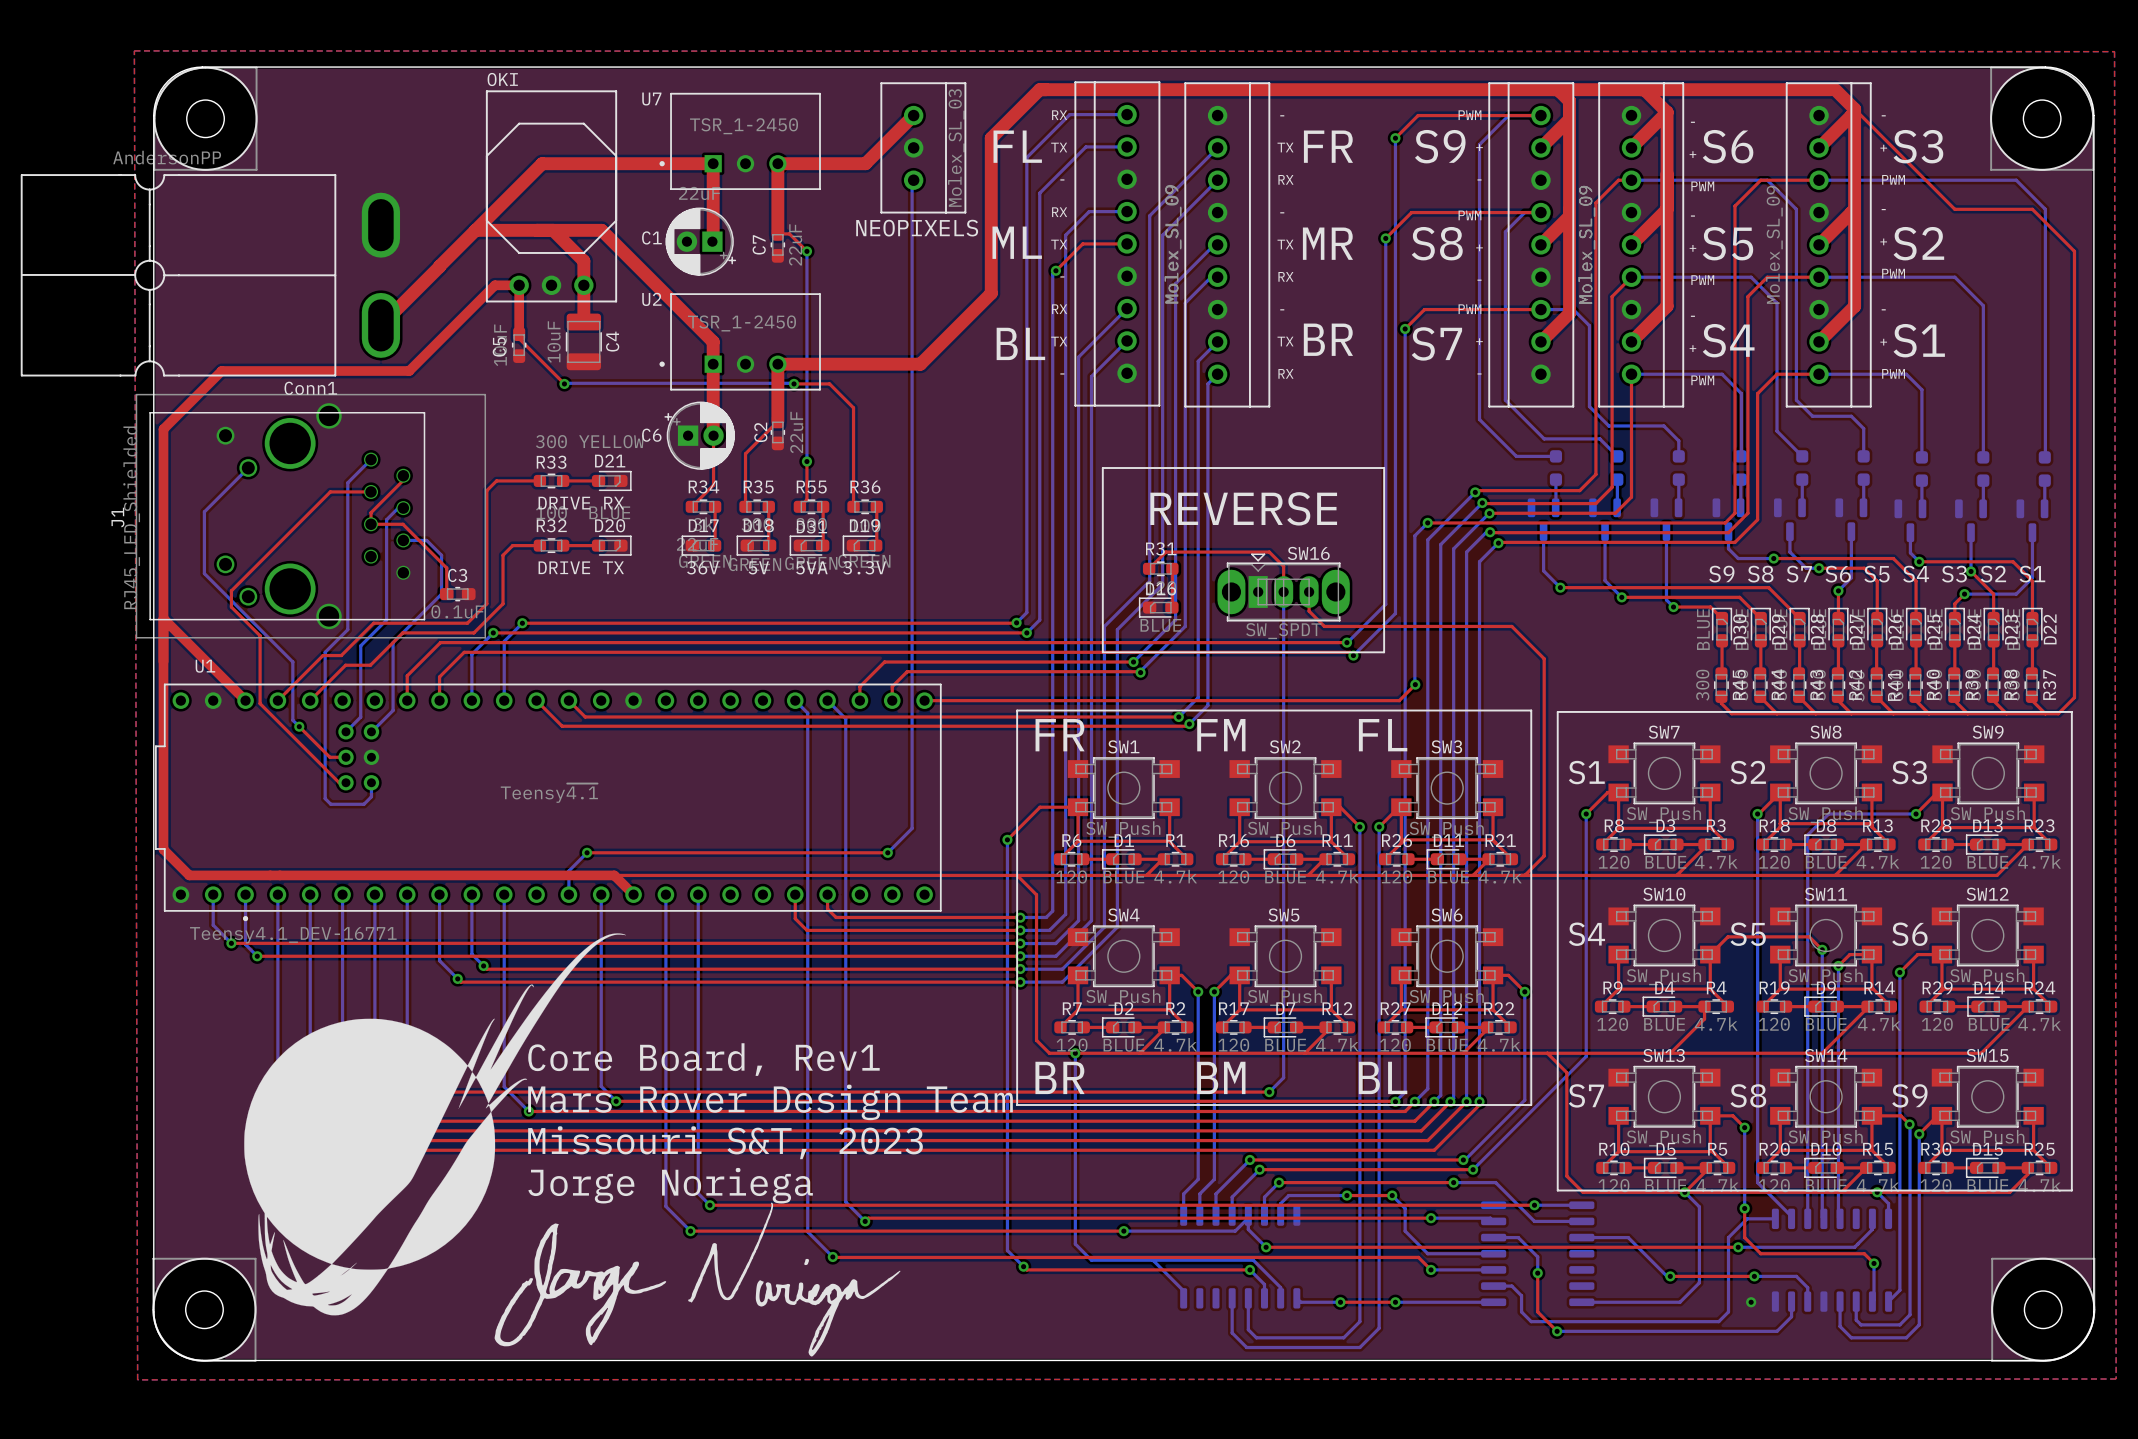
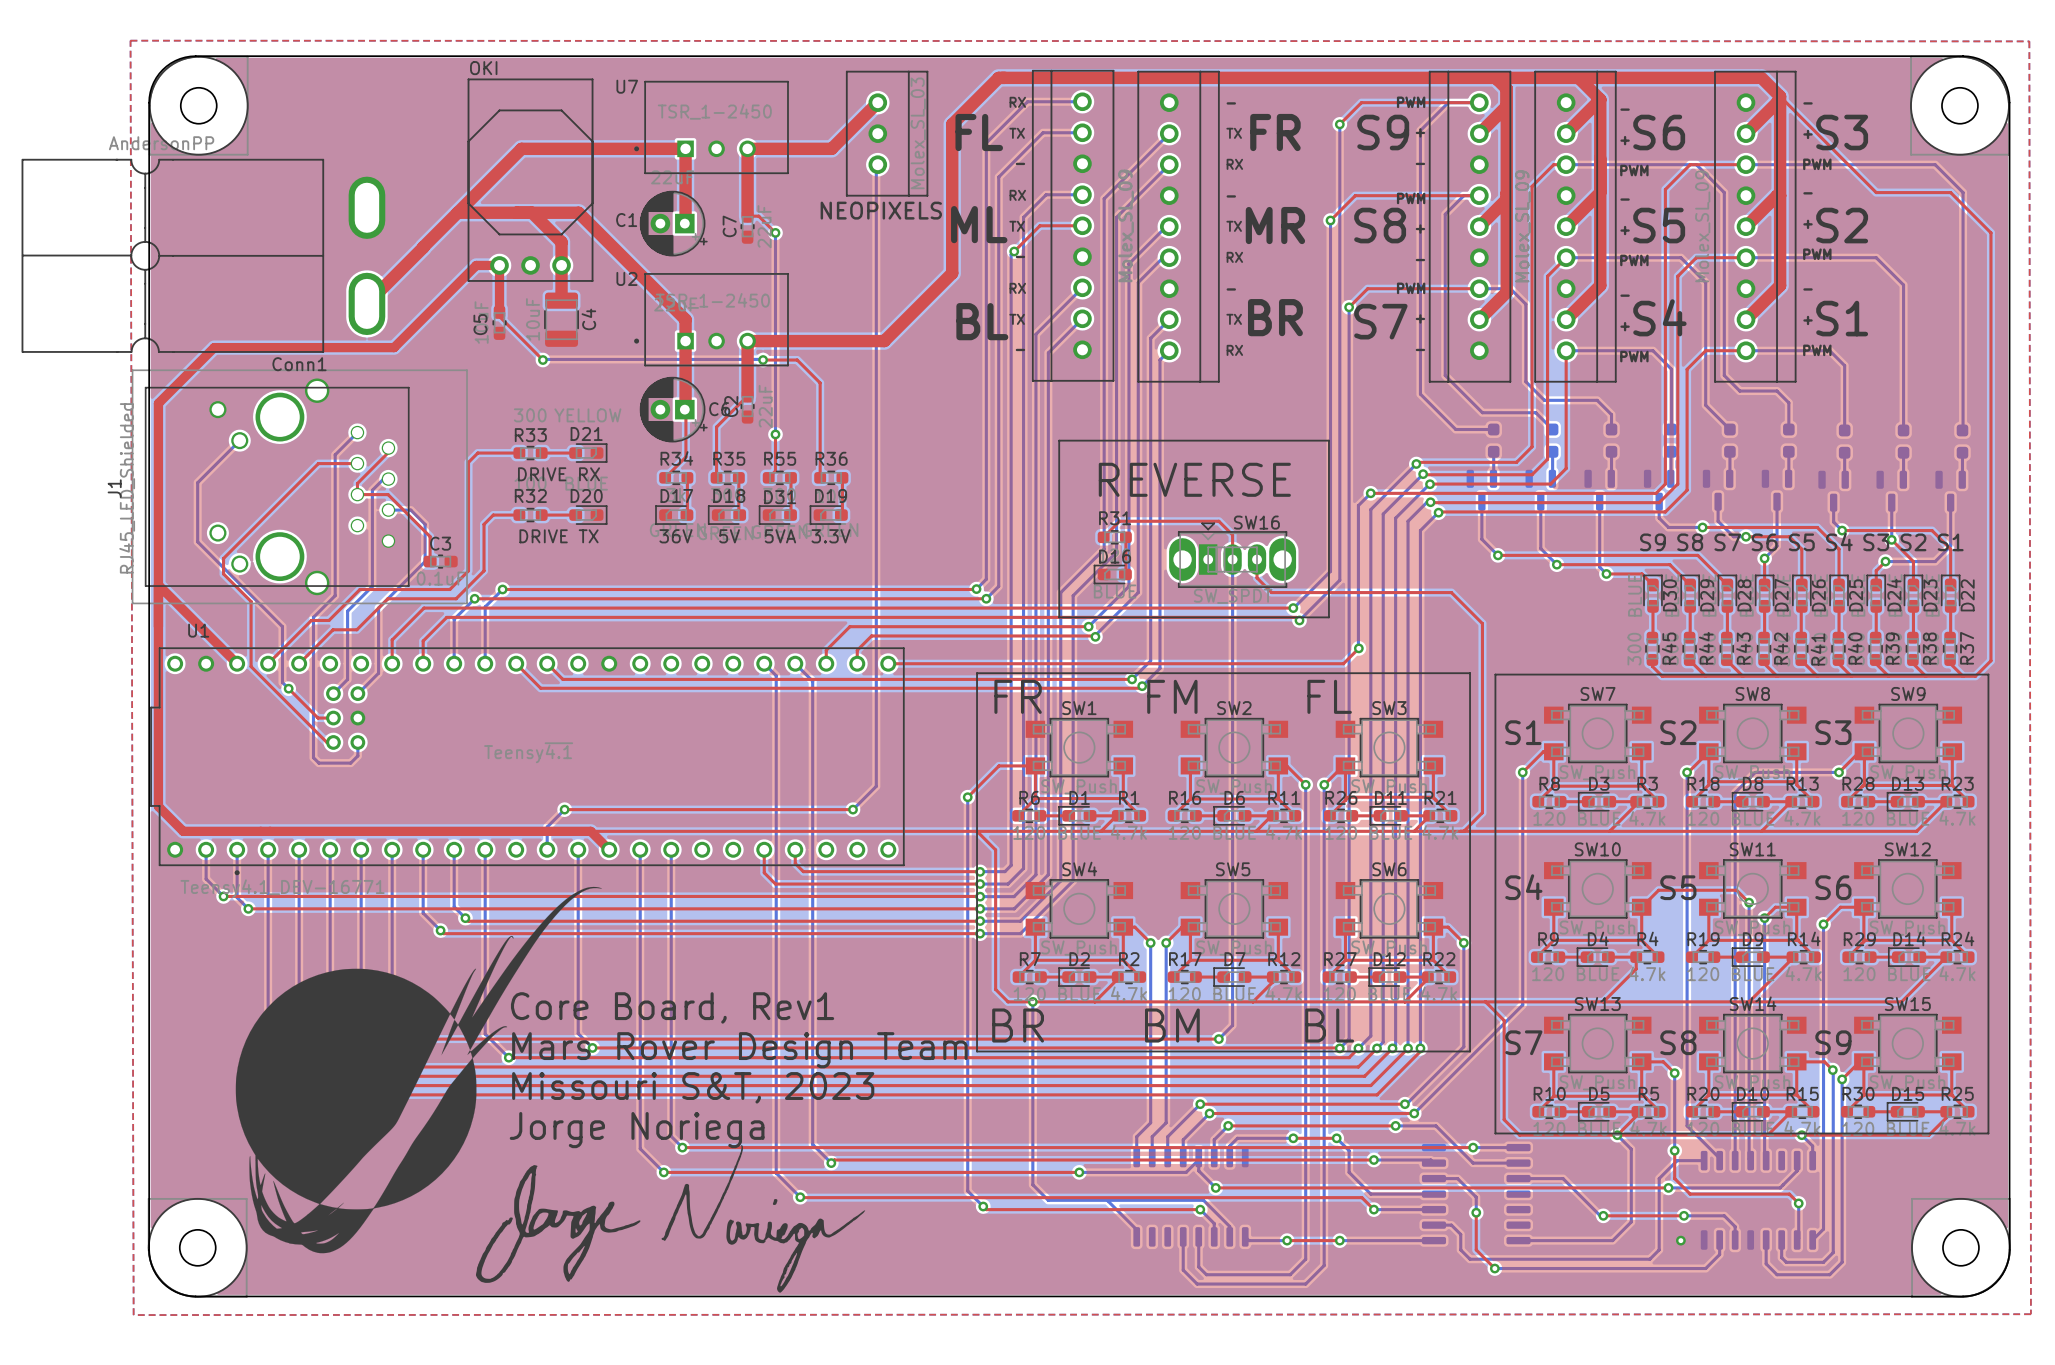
C6 rotation: 0° (699, 435) -> 180° (673, 409)

